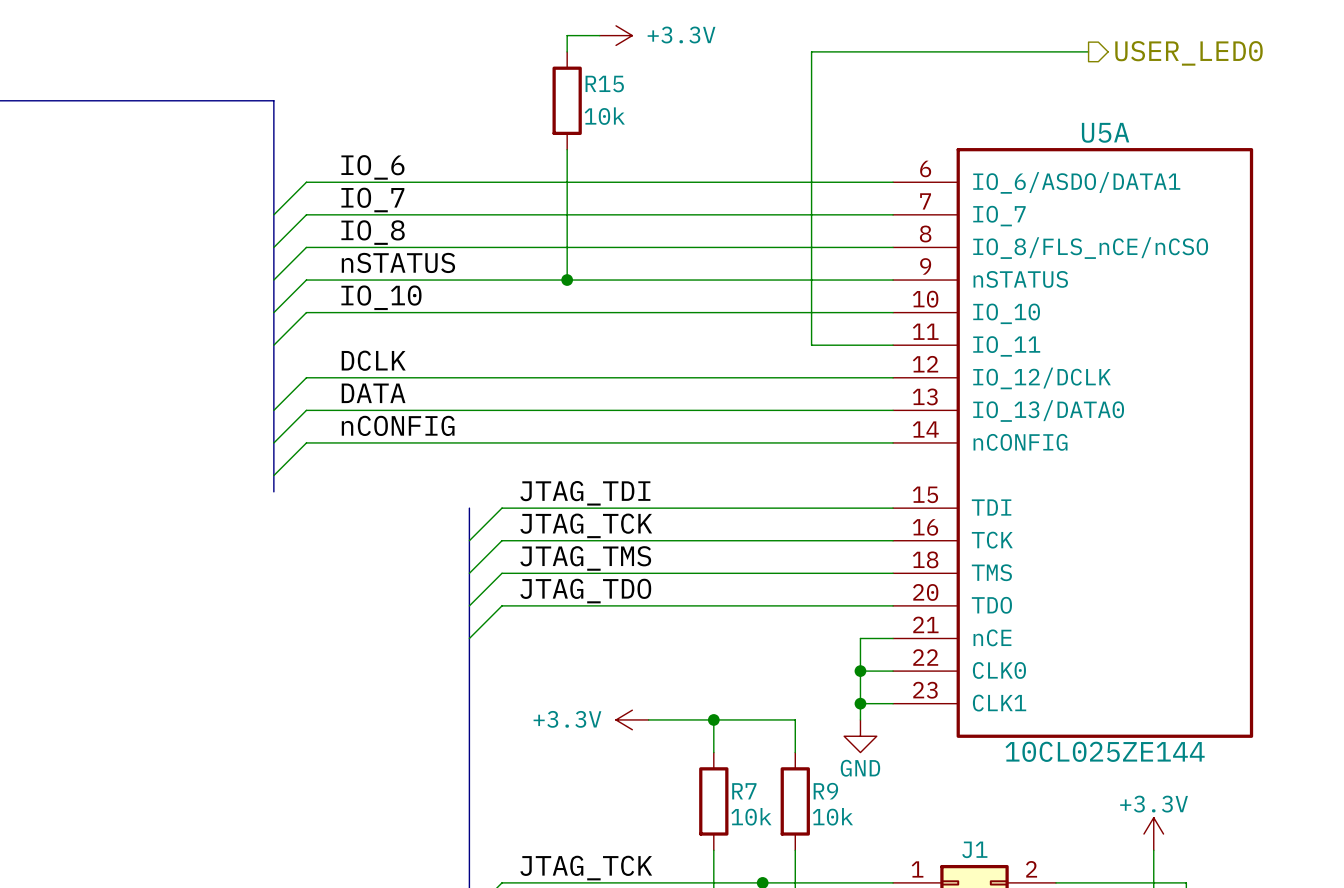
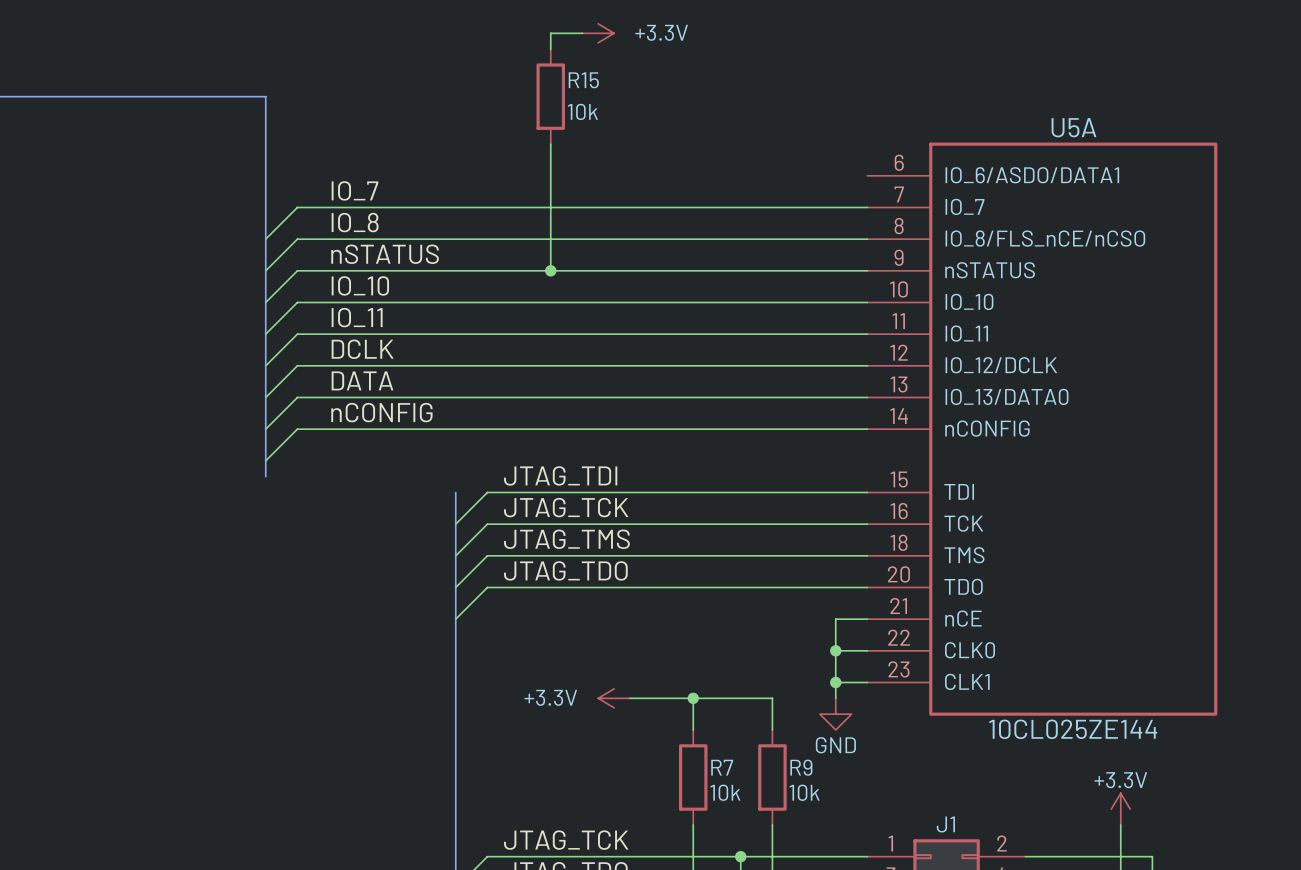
wire: (1088, 51) (811, 51) (811, 345) -> (265, 365) (297, 334) (788, 334)
hierarchical label: USER_LED0 (1188, 53) -> none
label: IO_6 (372, 167) -> none
wire: (893, 182) (306, 182) (273, 214) -> none
label: none -> IO_11 (357, 317)

